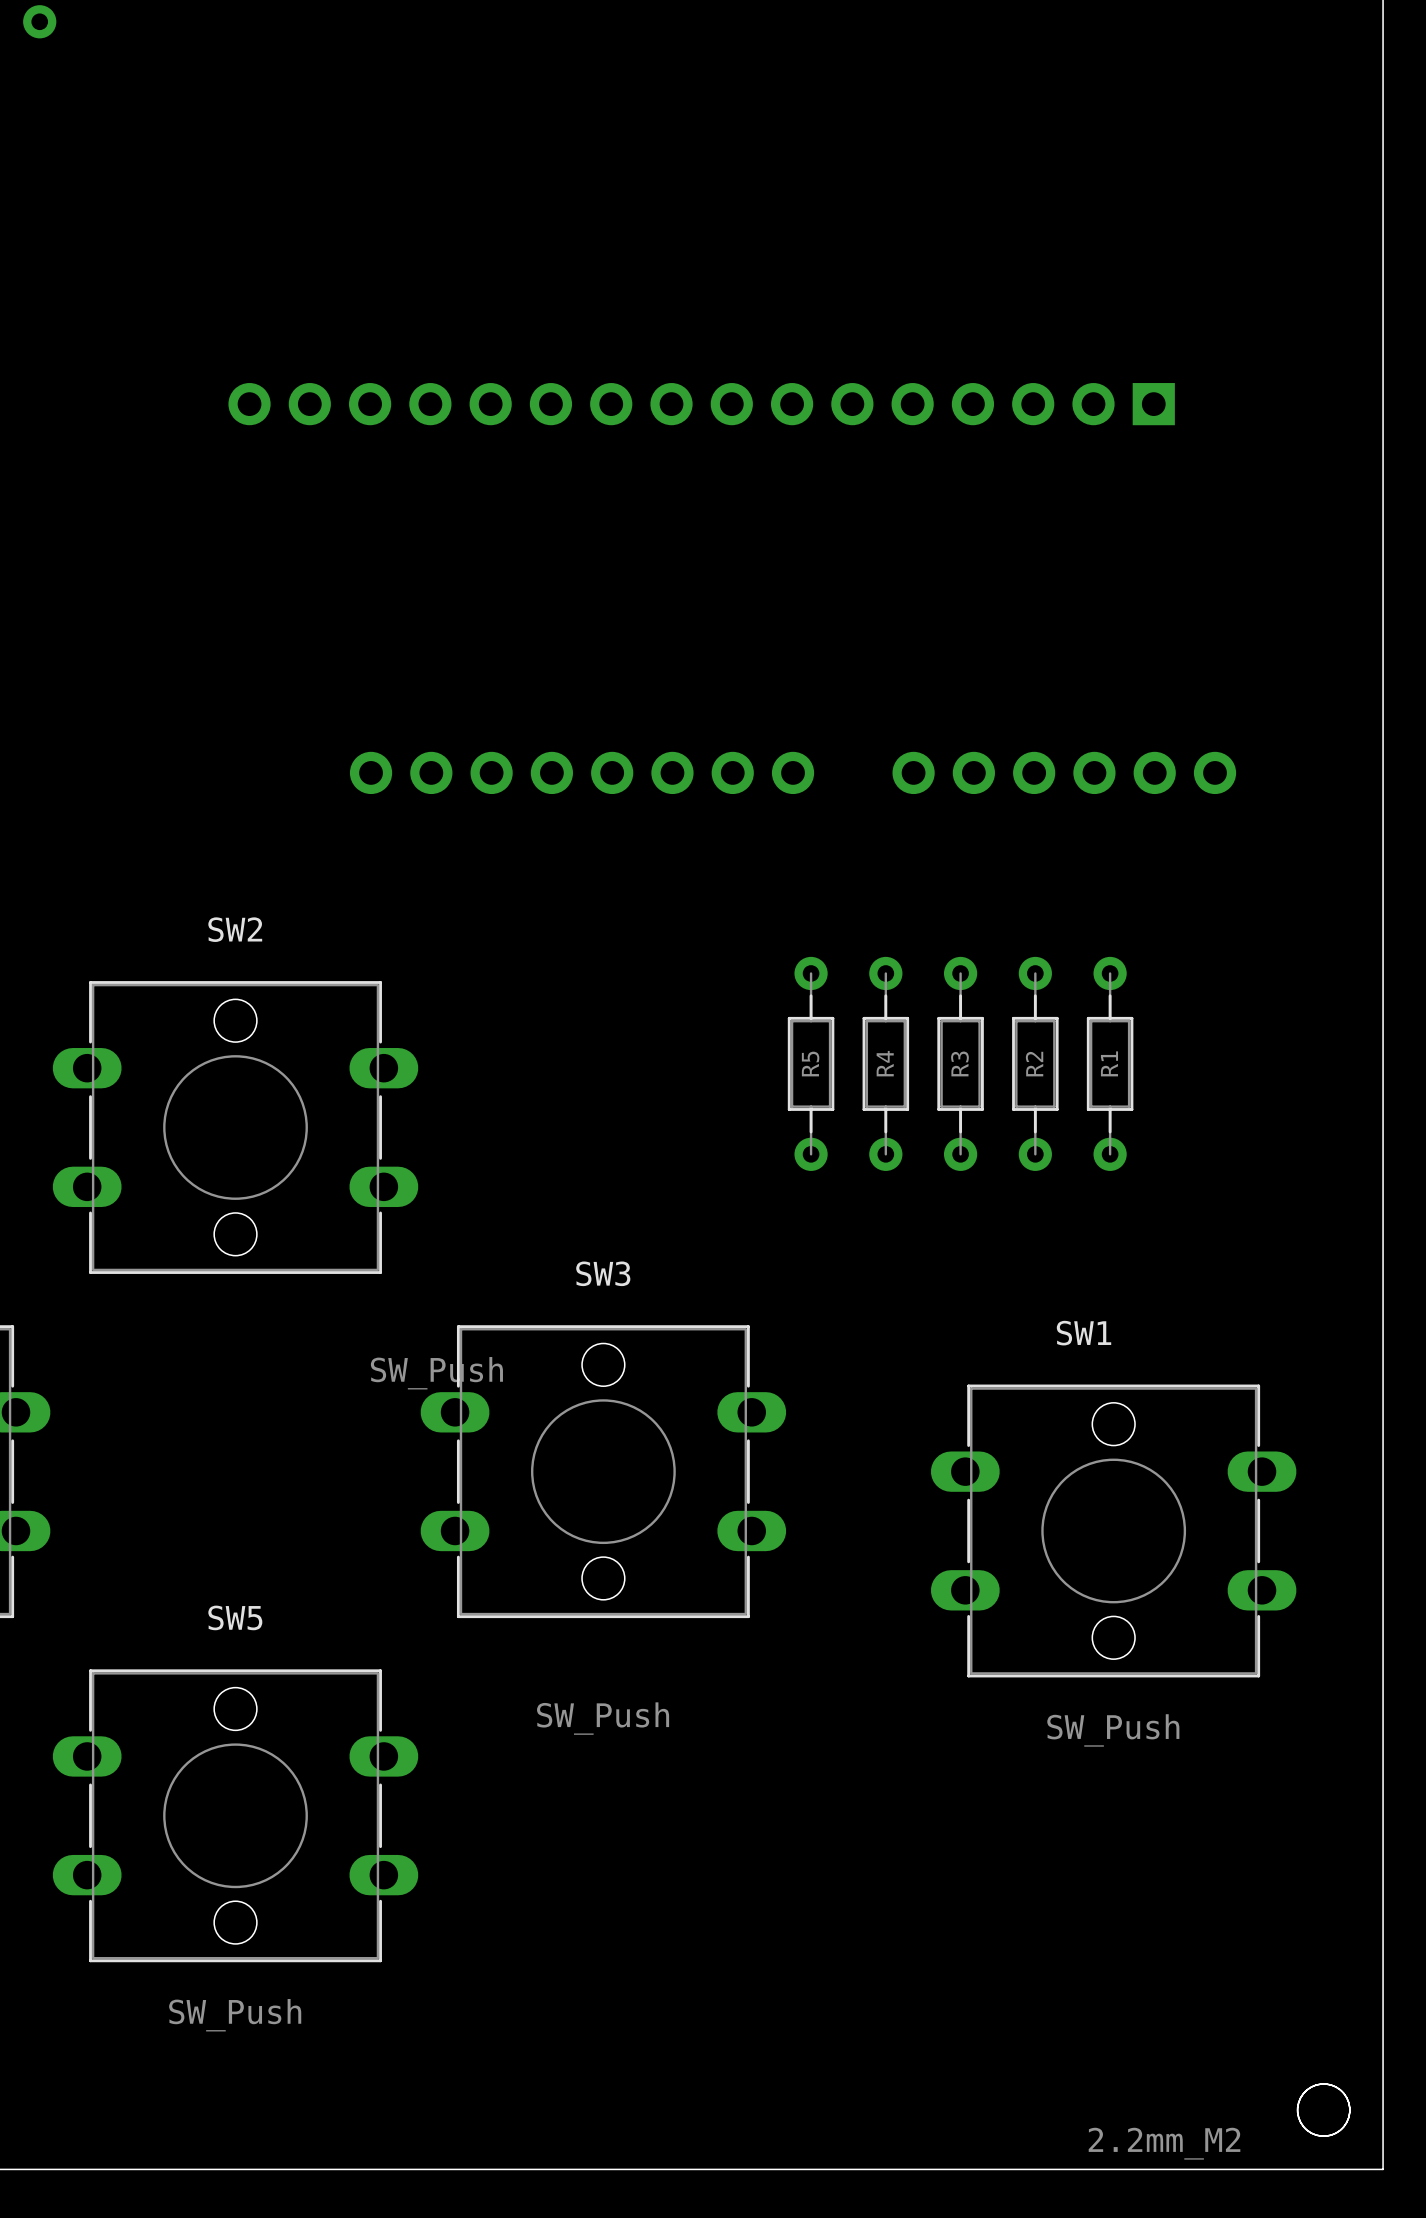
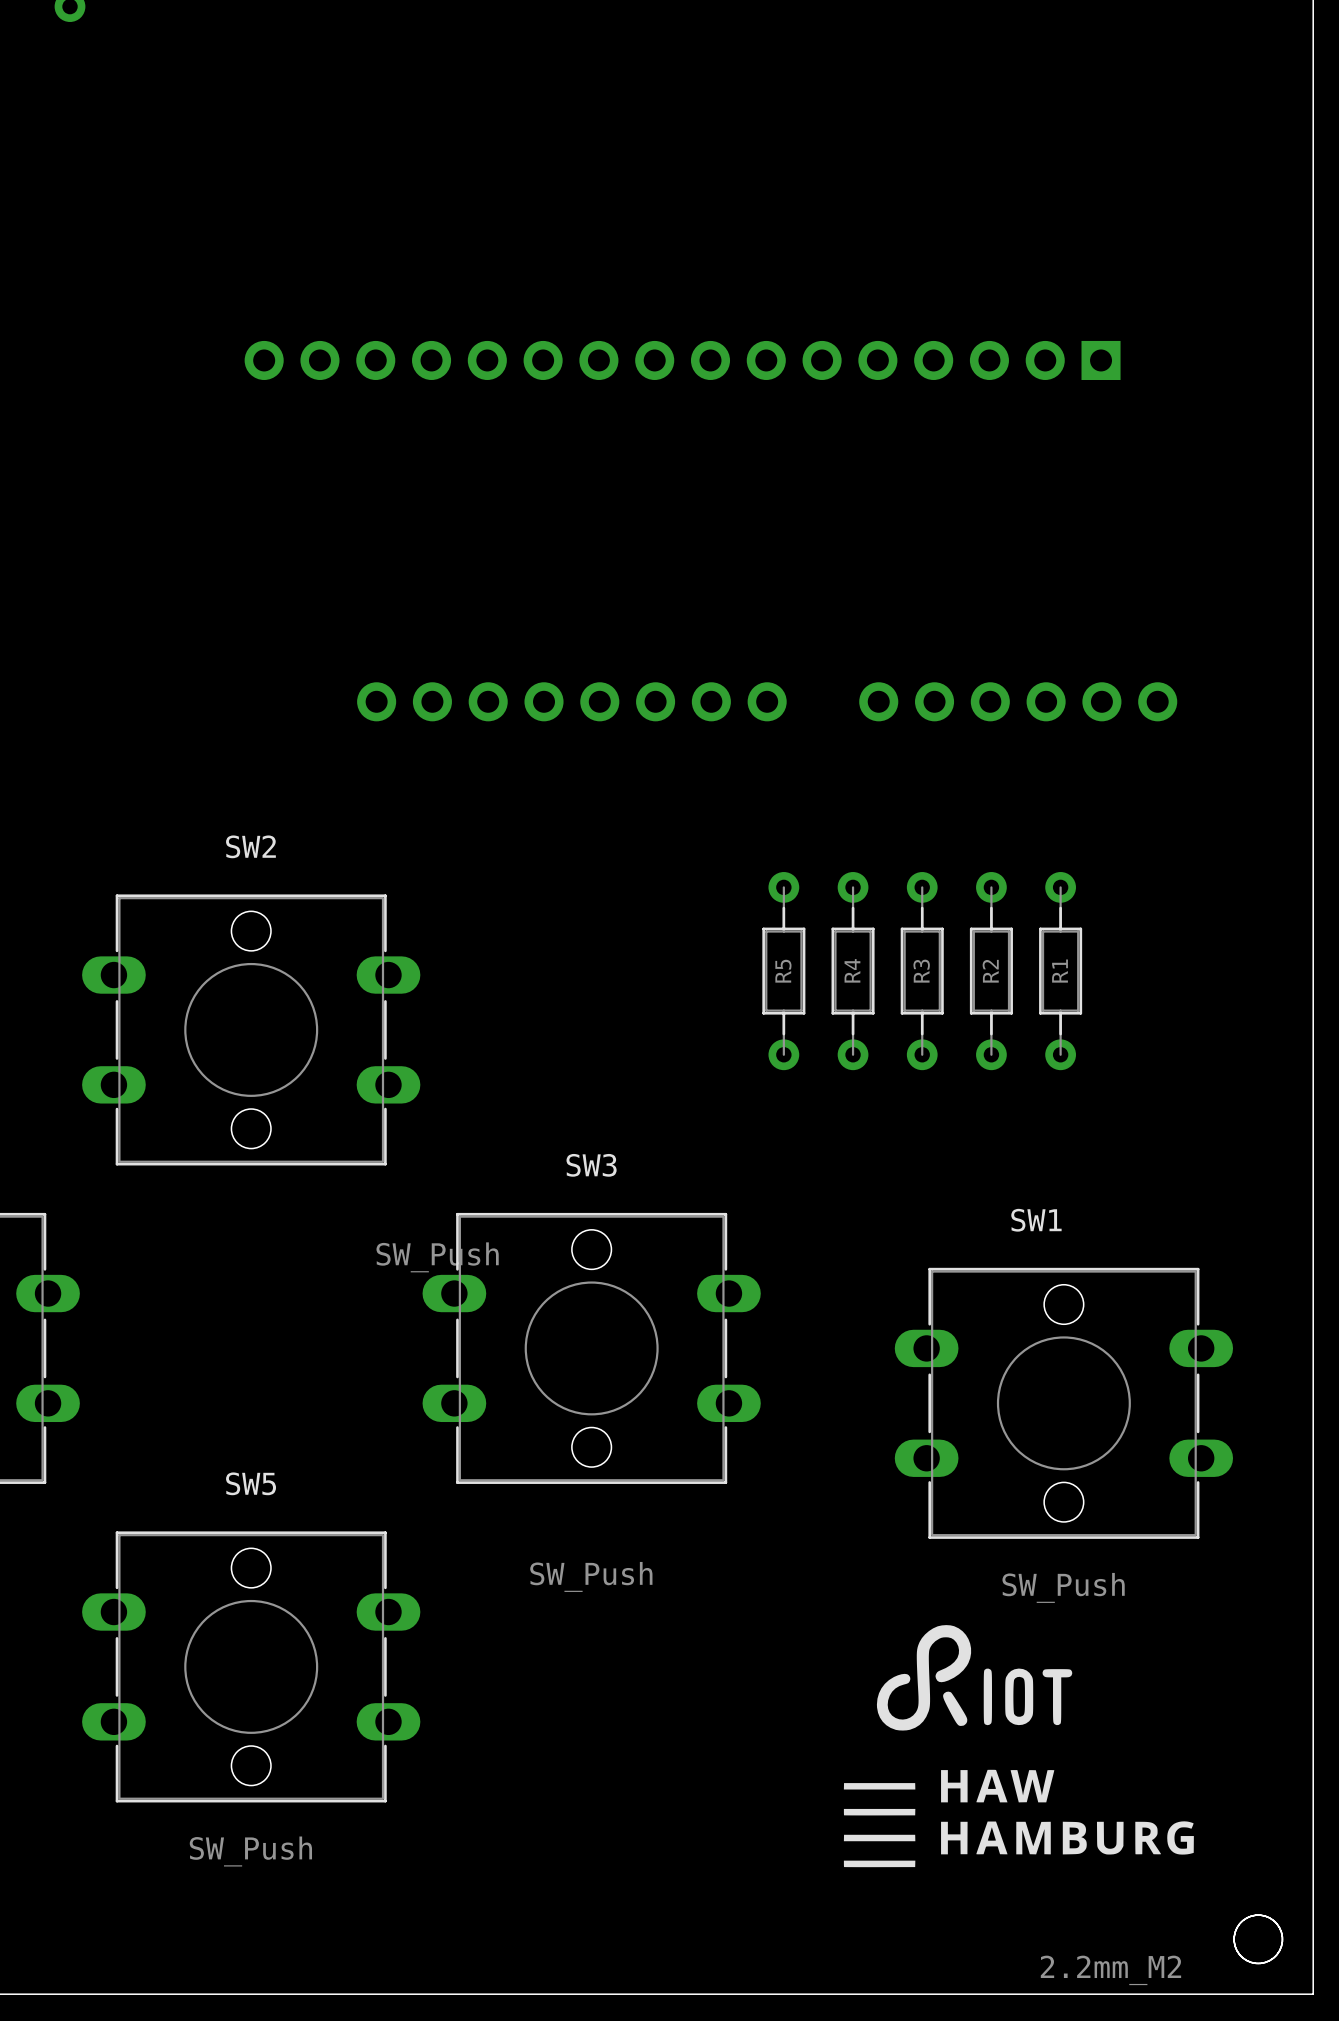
drawing: none -> [876, 1625, 1073, 1731]
drawing: none -> [843, 1769, 1194, 1868]

